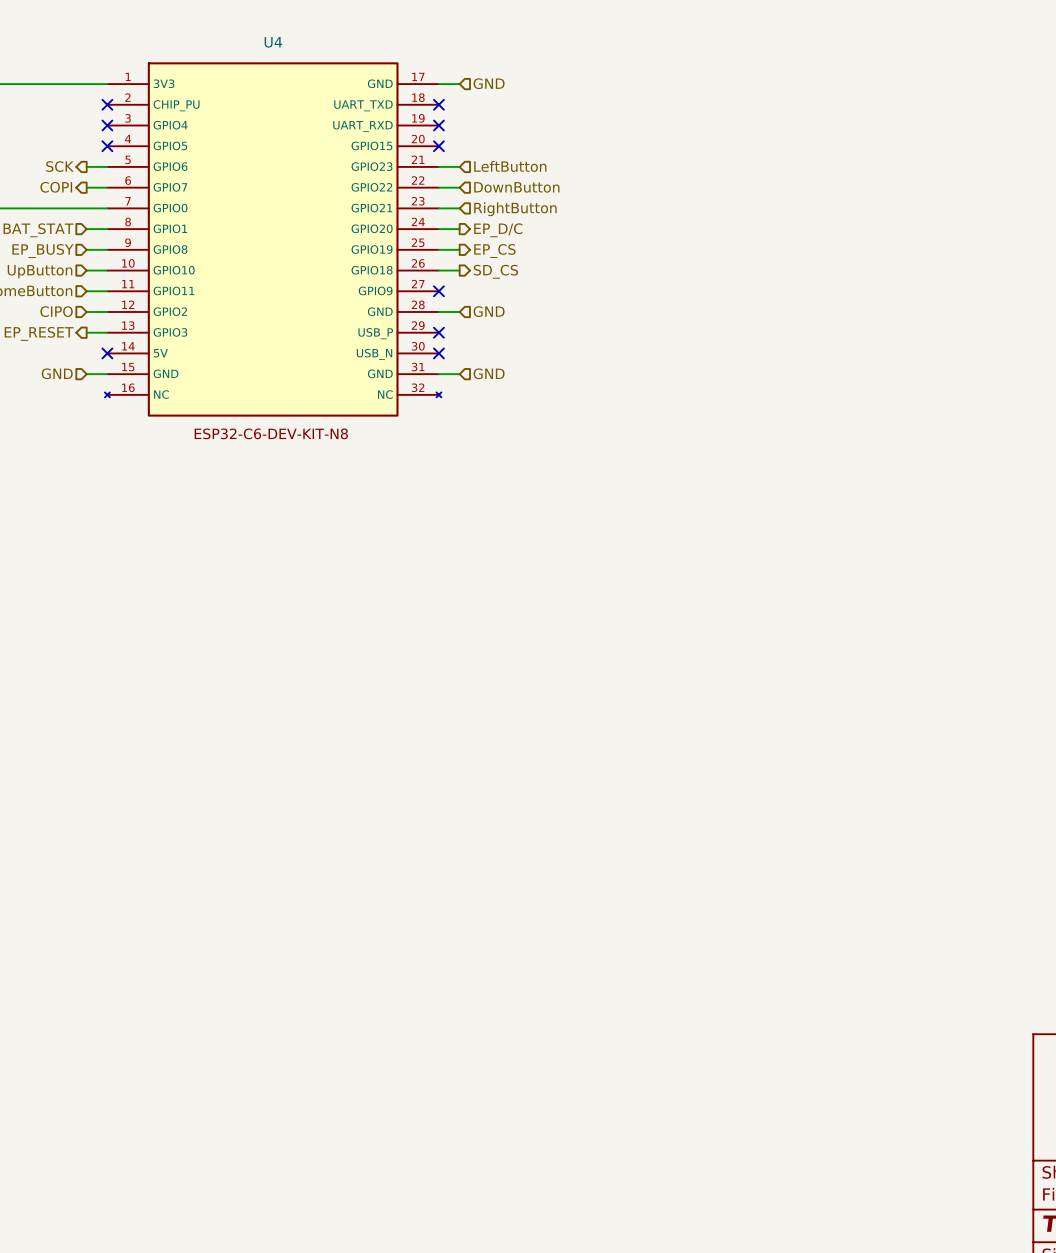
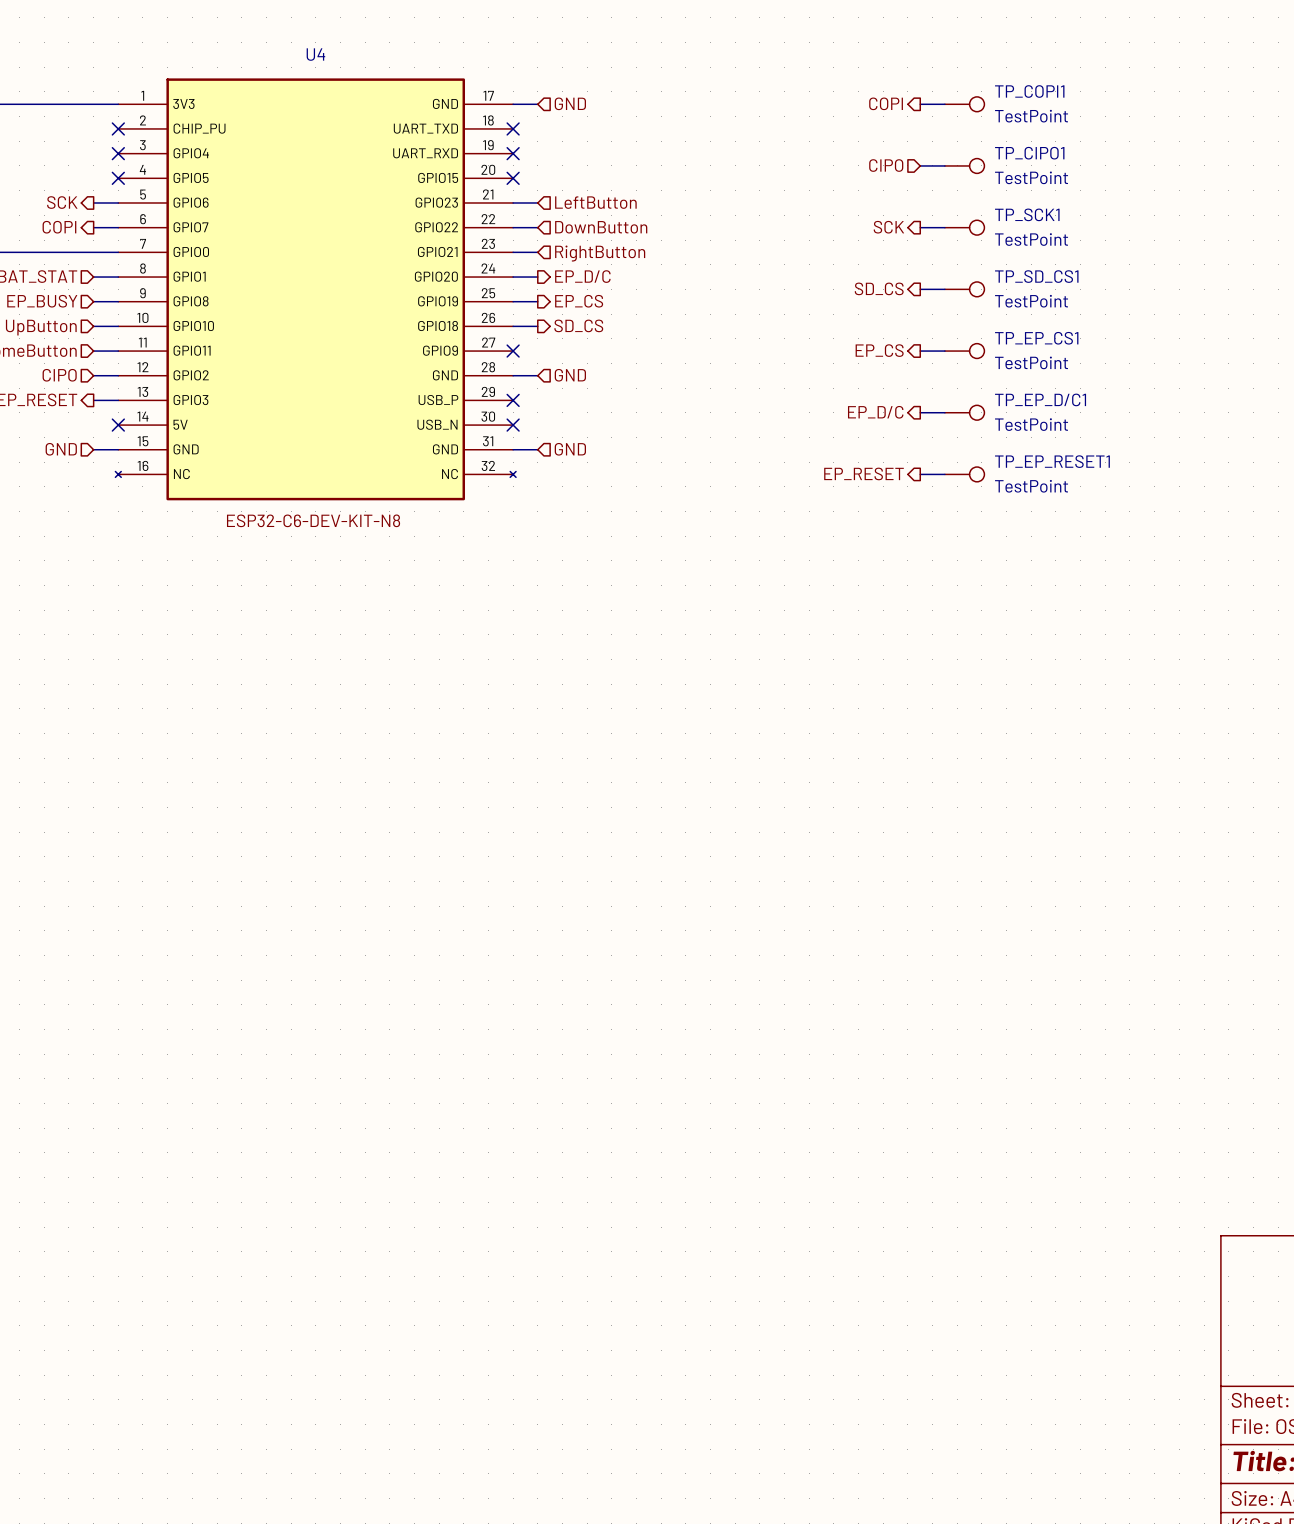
hierarchical label: none -> COPI (886, 103)
wire: none -> (920, 104) (944, 104)
TP_COPI1: none -> TestPoint (964, 104)
hierarchical label: none -> CIPO (886, 165)
wire: none -> (920, 165) (944, 165)
TP_CIPO1: none -> TestPoint (964, 165)
hierarchical label: none -> SCK (888, 227)
wire: none -> (920, 227) (944, 227)
TP_SCK1: none -> TestPoint (964, 227)
wire: none -> (920, 289) (944, 289)
TP_SD_CS1: none -> TestPoint (964, 289)
hierarchical label: none -> SD_CS (879, 288)
wire: none -> (920, 351) (944, 351)
TP_EP_CS1: none -> TestPoint (964, 351)
hierarchical label: none -> EP_CS (879, 350)
wire: none -> (920, 412) (944, 412)
TP_EP_D/C1: none -> TestPoint (964, 412)
hierarchical label: none -> EP_D/C (875, 412)
wire: none -> (920, 474) (944, 474)
TP_EP_RESET1: none -> TestPoint (964, 474)
hierarchical label: none -> EP_RESET (864, 473)

